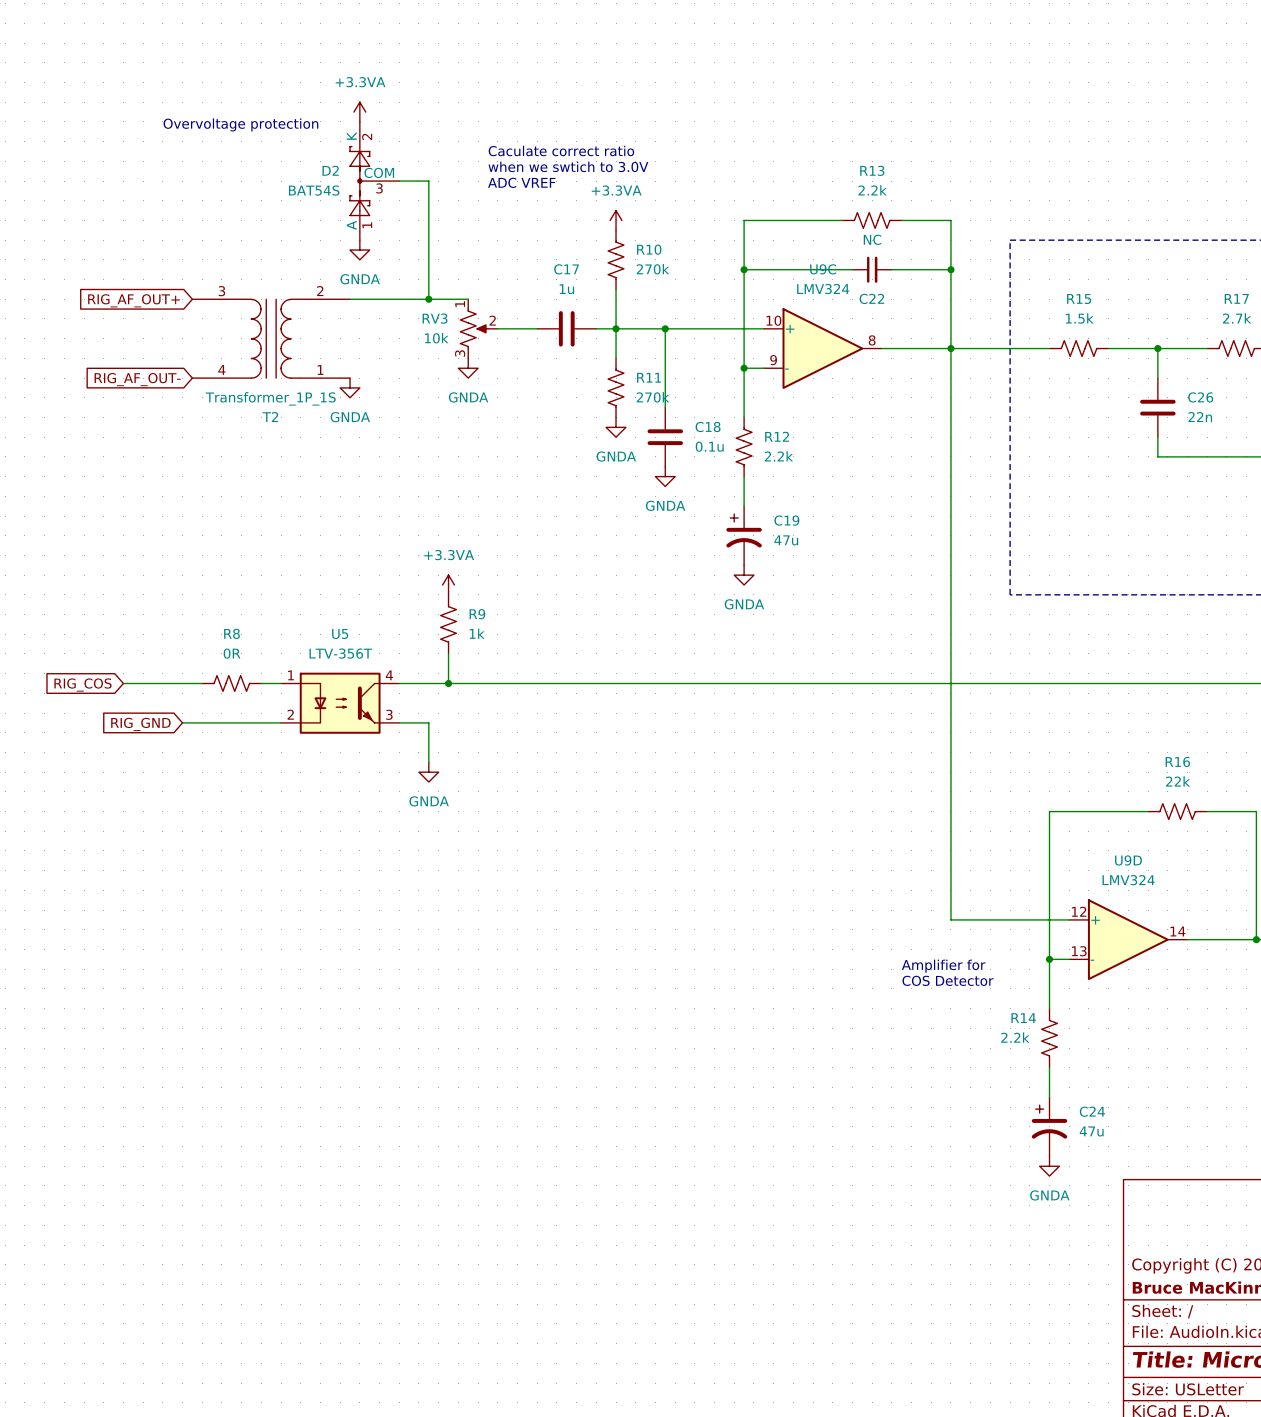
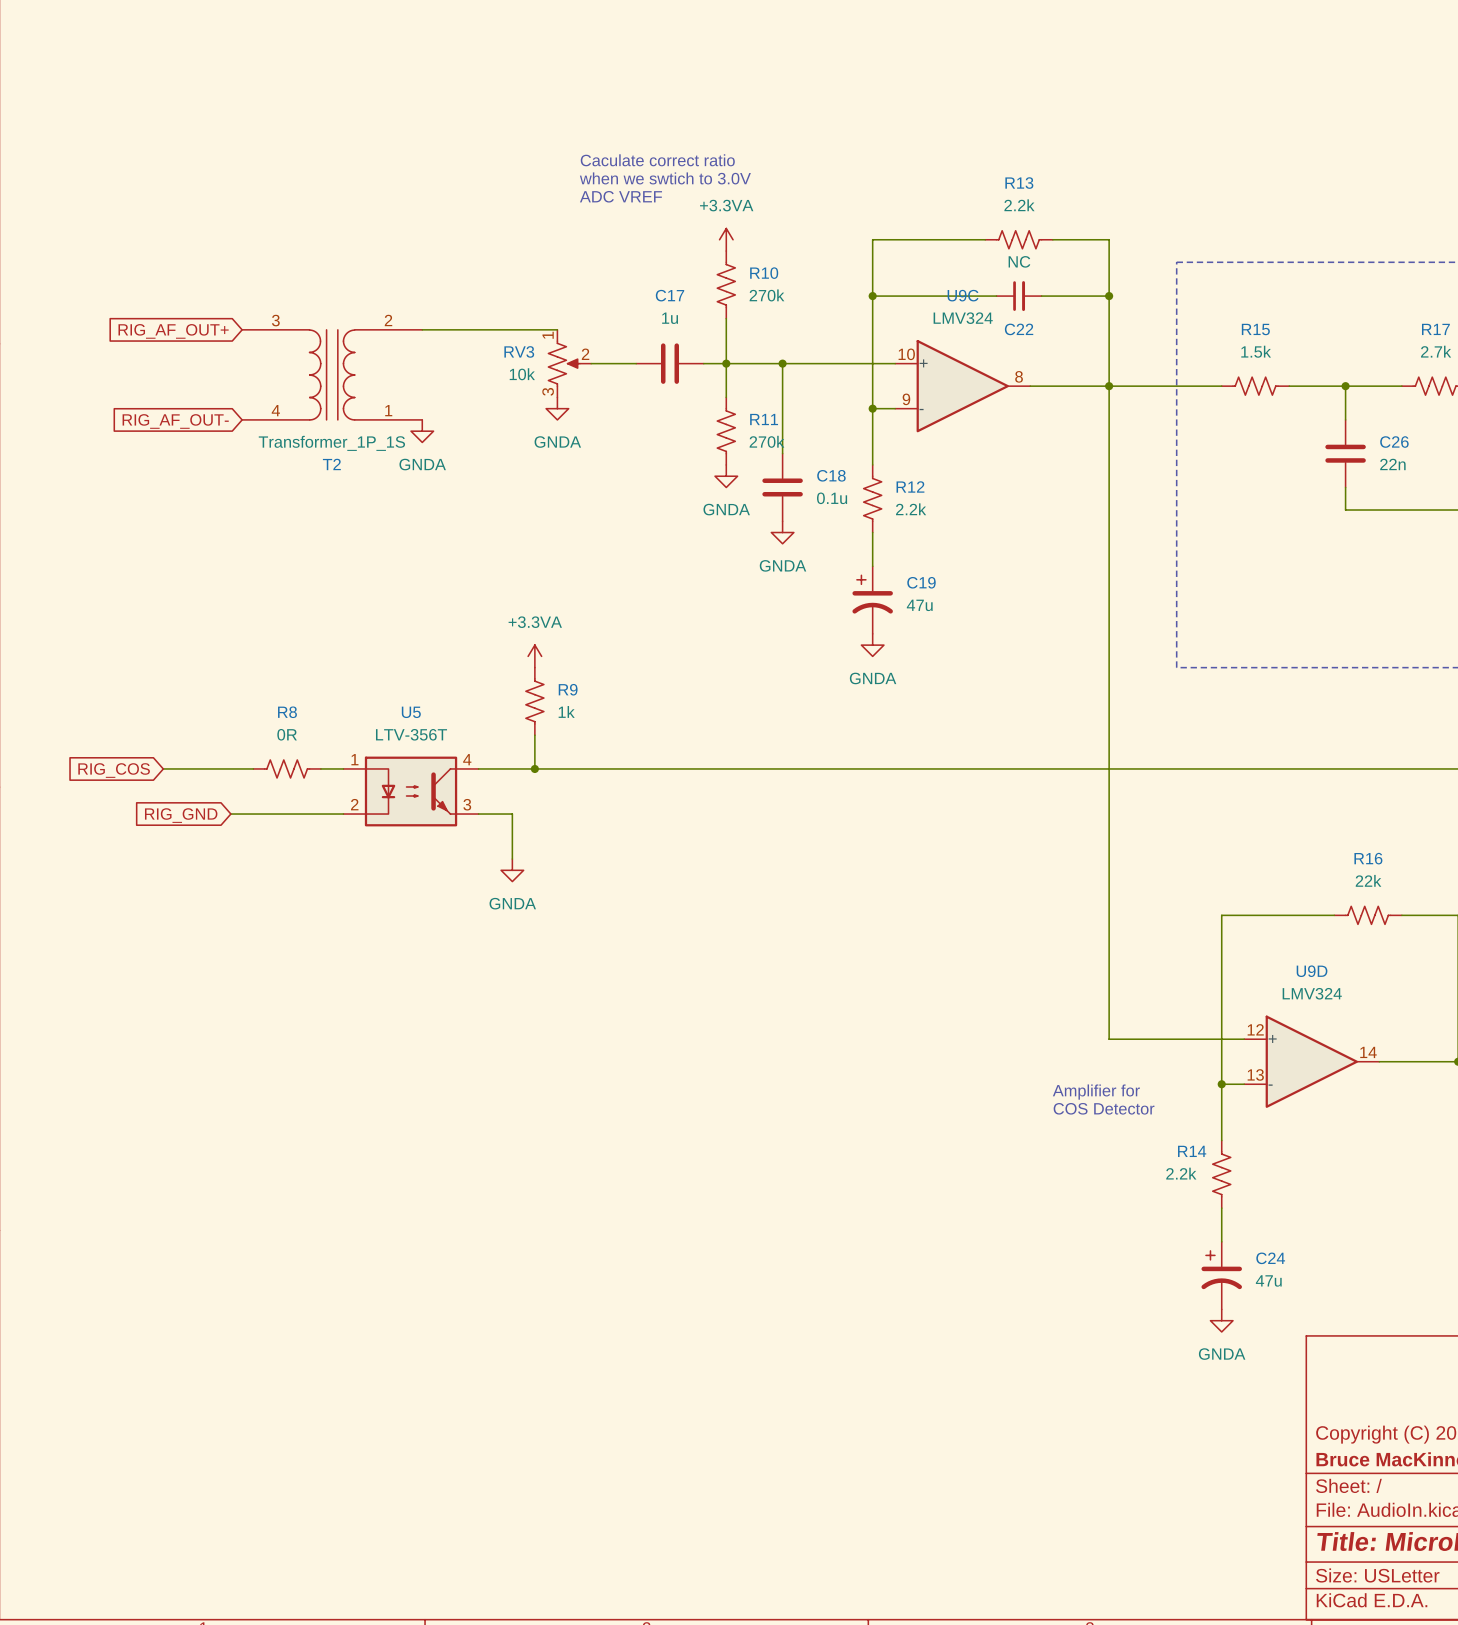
power symbol: +3.3VA (359, 112) -> none
text: Overvoltage protection (240, 124) -> none
D2: BAT54S (374, 181) -> none
wire: (399, 181) (428, 181) (428, 299) -> none
power symbol: GNDA (359, 250) -> none
junction: (428, 299) -> none

